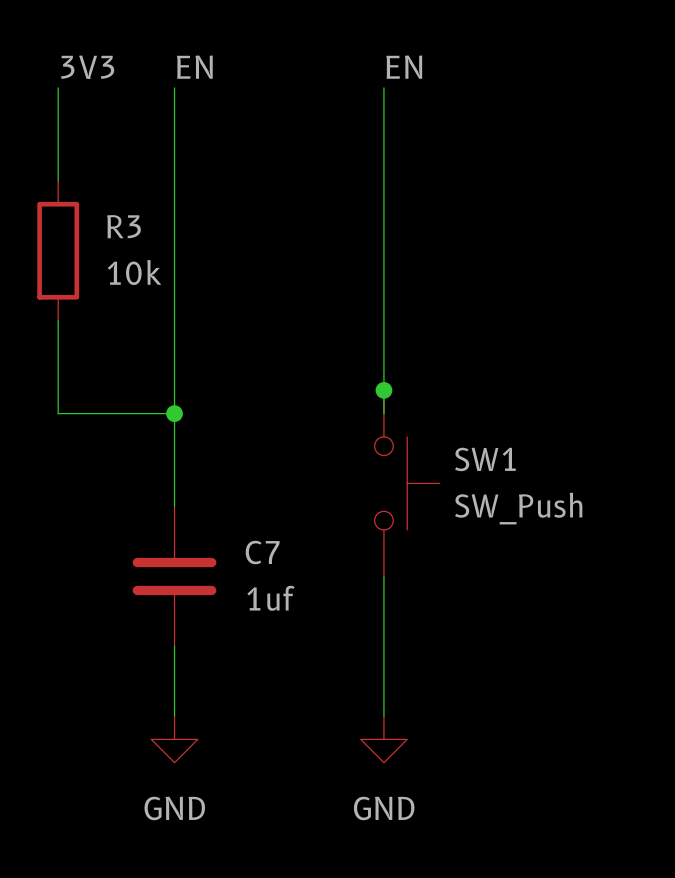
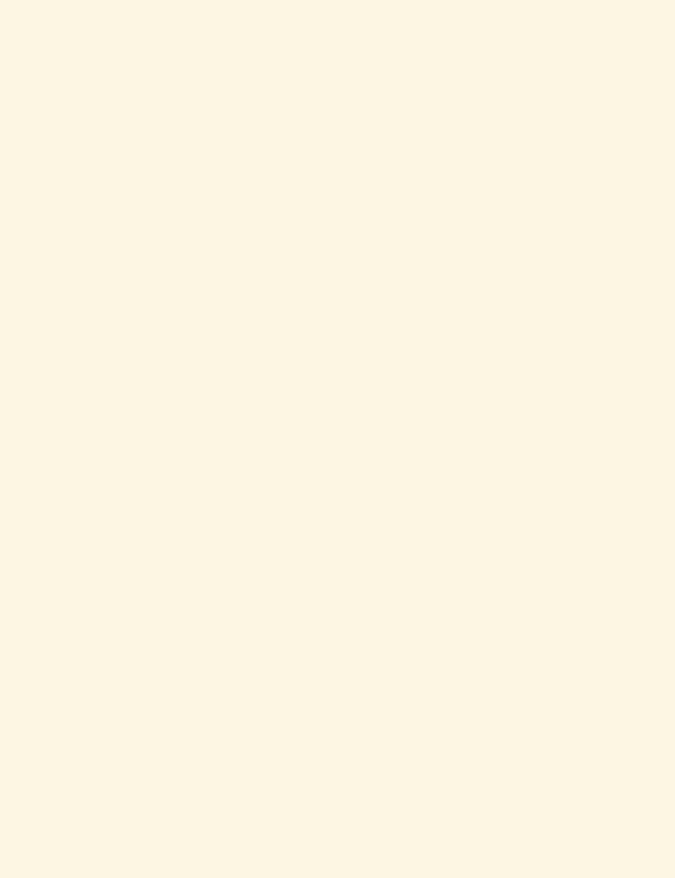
label: 3V3 (87, 67) -> none
label: EN (194, 67) -> none
label: EN (404, 67) -> none
wire: (58, 87) (58, 180) -> none
wire: (174, 87) (174, 506) -> none
wire: (383, 87) (383, 413) -> none
R3: 10k (58, 250) -> none
wire: (58, 320) (58, 413) (174, 413) -> none
junction: (383, 390) -> none
junction: (174, 413) -> none
SW1: SW_Push (407, 483) -> none
C7: 1uf (174, 576) -> none
wire: (383, 576) (383, 716) -> none
wire: (174, 646) (174, 716) -> none
power symbol: GND (174, 739) -> none
power symbol: GND (383, 739) -> none

